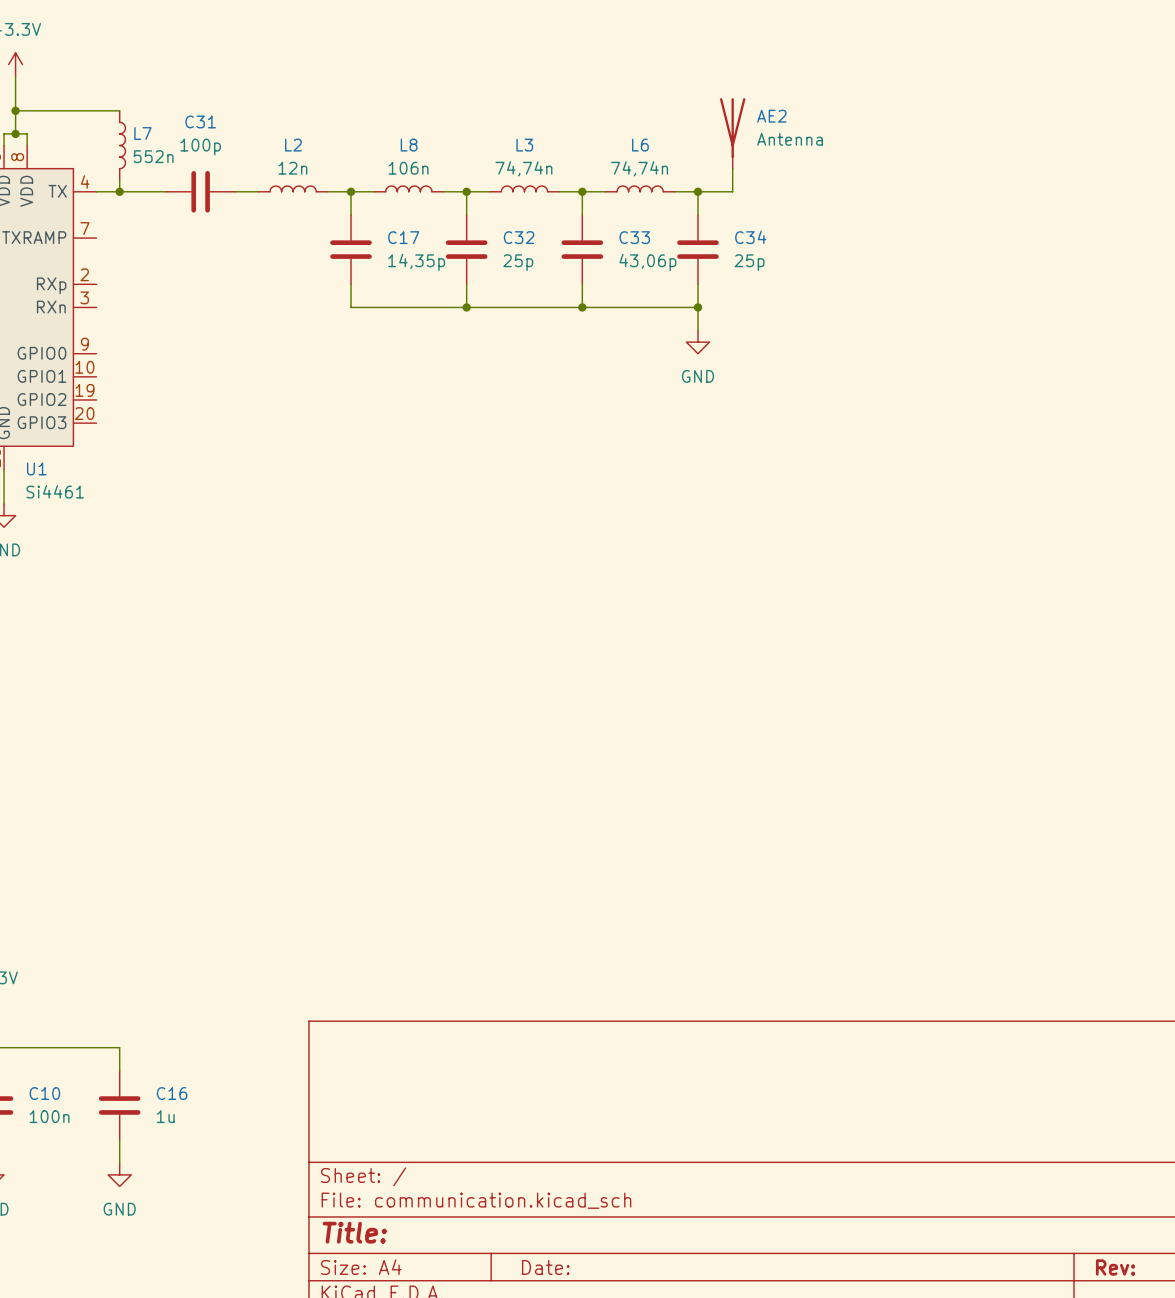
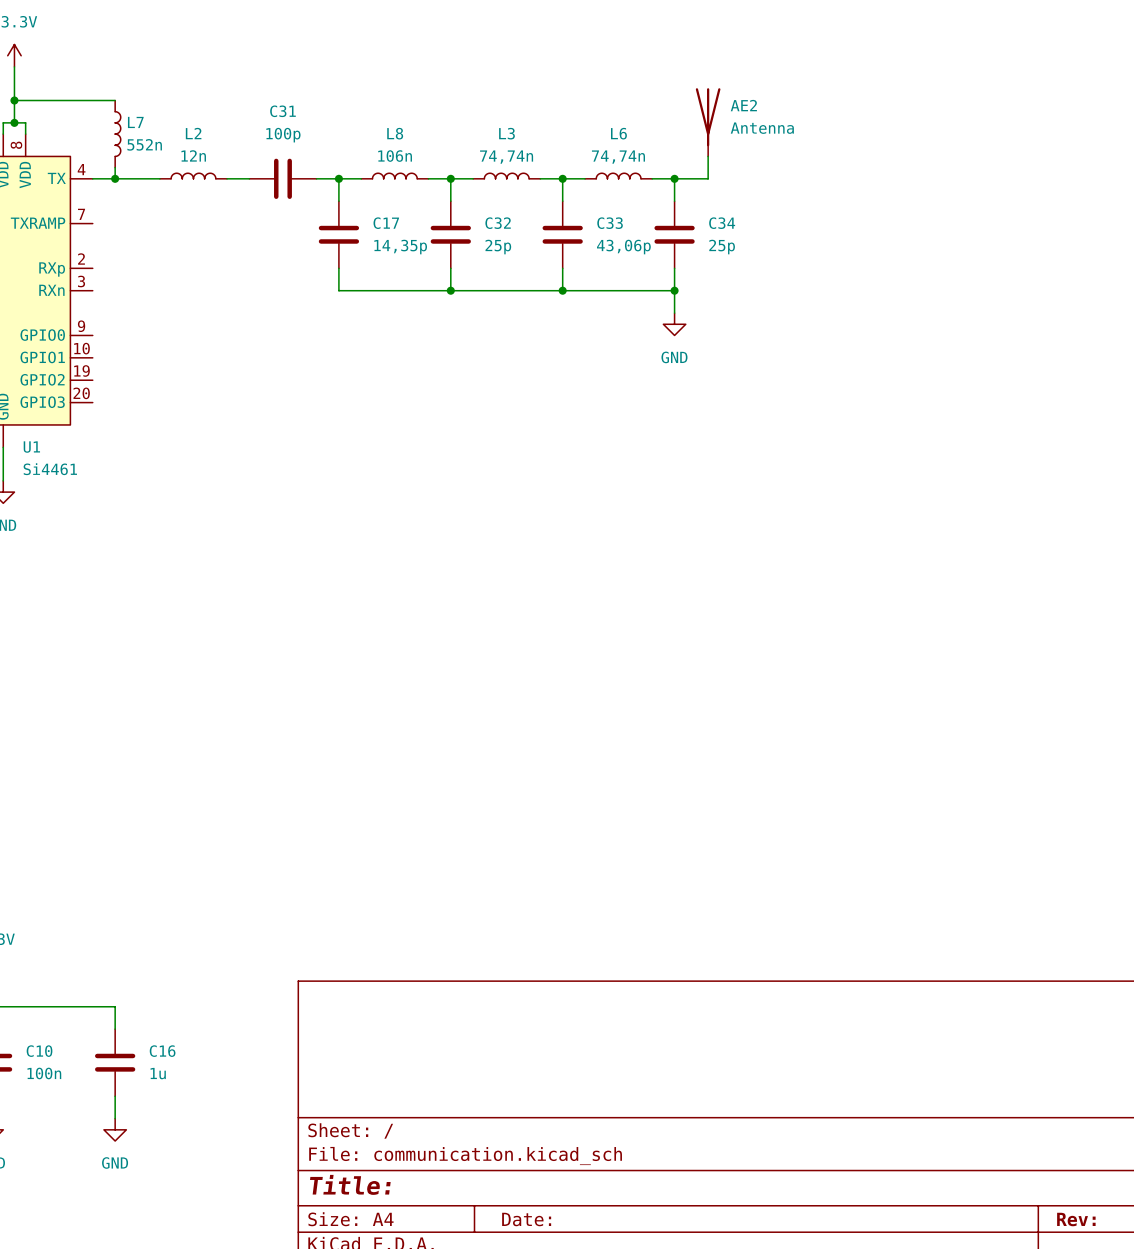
L2 position: (293, 188) -> (193, 176)
C31 position: (200, 191) -> (282, 178)

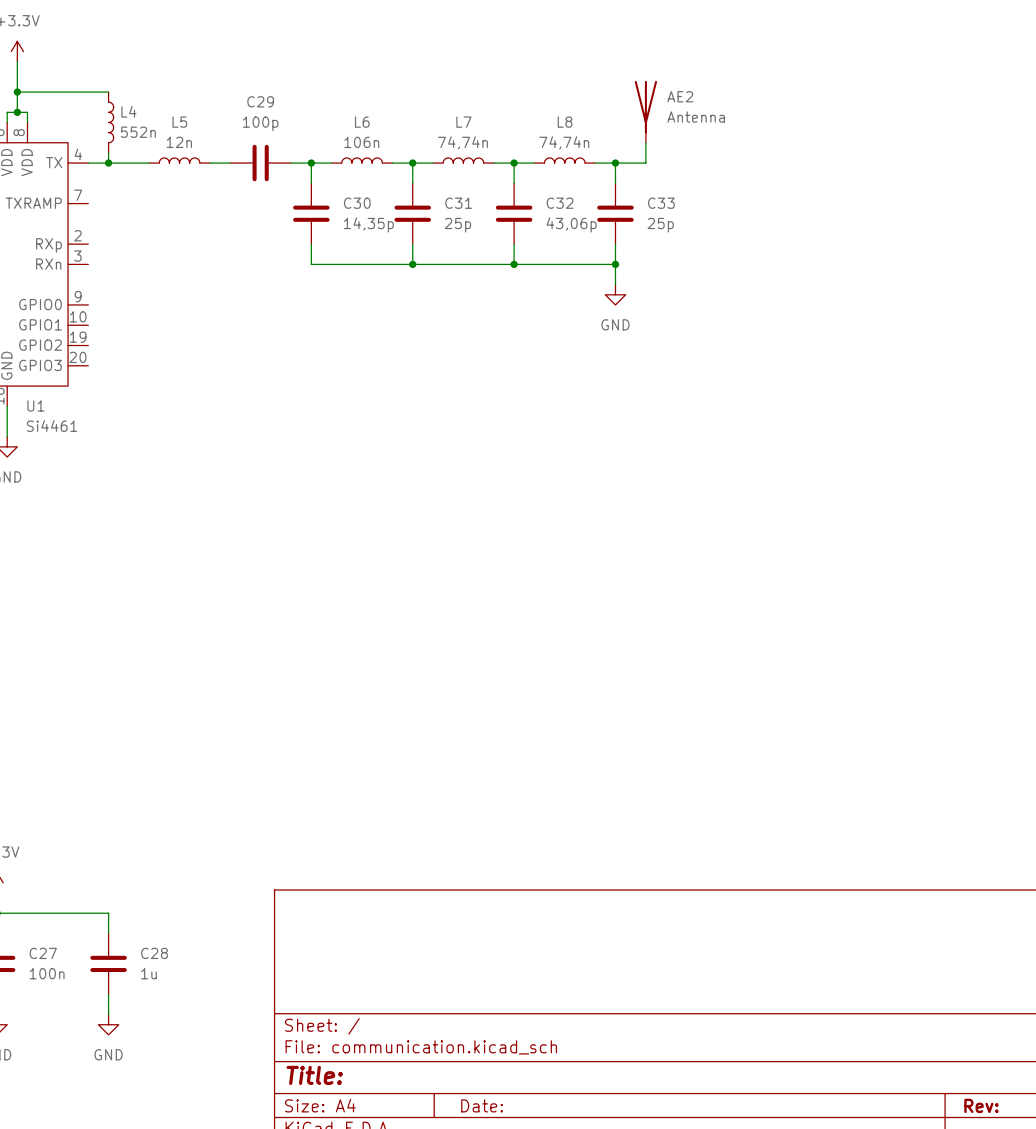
C31 name: C31 (282, 111) -> C29 (260, 101)
L7 name: L7 (135, 122) -> L4 (128, 111)
L2 name: L2 (193, 133) -> L5 (179, 122)
L8 name: L8 (395, 133) -> L6 (362, 122)
L3 name: L3 (506, 133) -> L7 (463, 122)
L6 name: L6 (618, 133) -> L8 (565, 122)
C17 name: C17 (386, 223) -> C30 (357, 203)
C32 name: C32 (498, 223) -> C31 (458, 203)
C33 name: C33 (610, 223) -> C32 (560, 203)
C34 name: C34 (722, 223) -> C33 (661, 203)
C10 name: C10 (39, 1051) -> C27 (43, 953)
C16 name: C16 (162, 1051) -> C28 (154, 953)

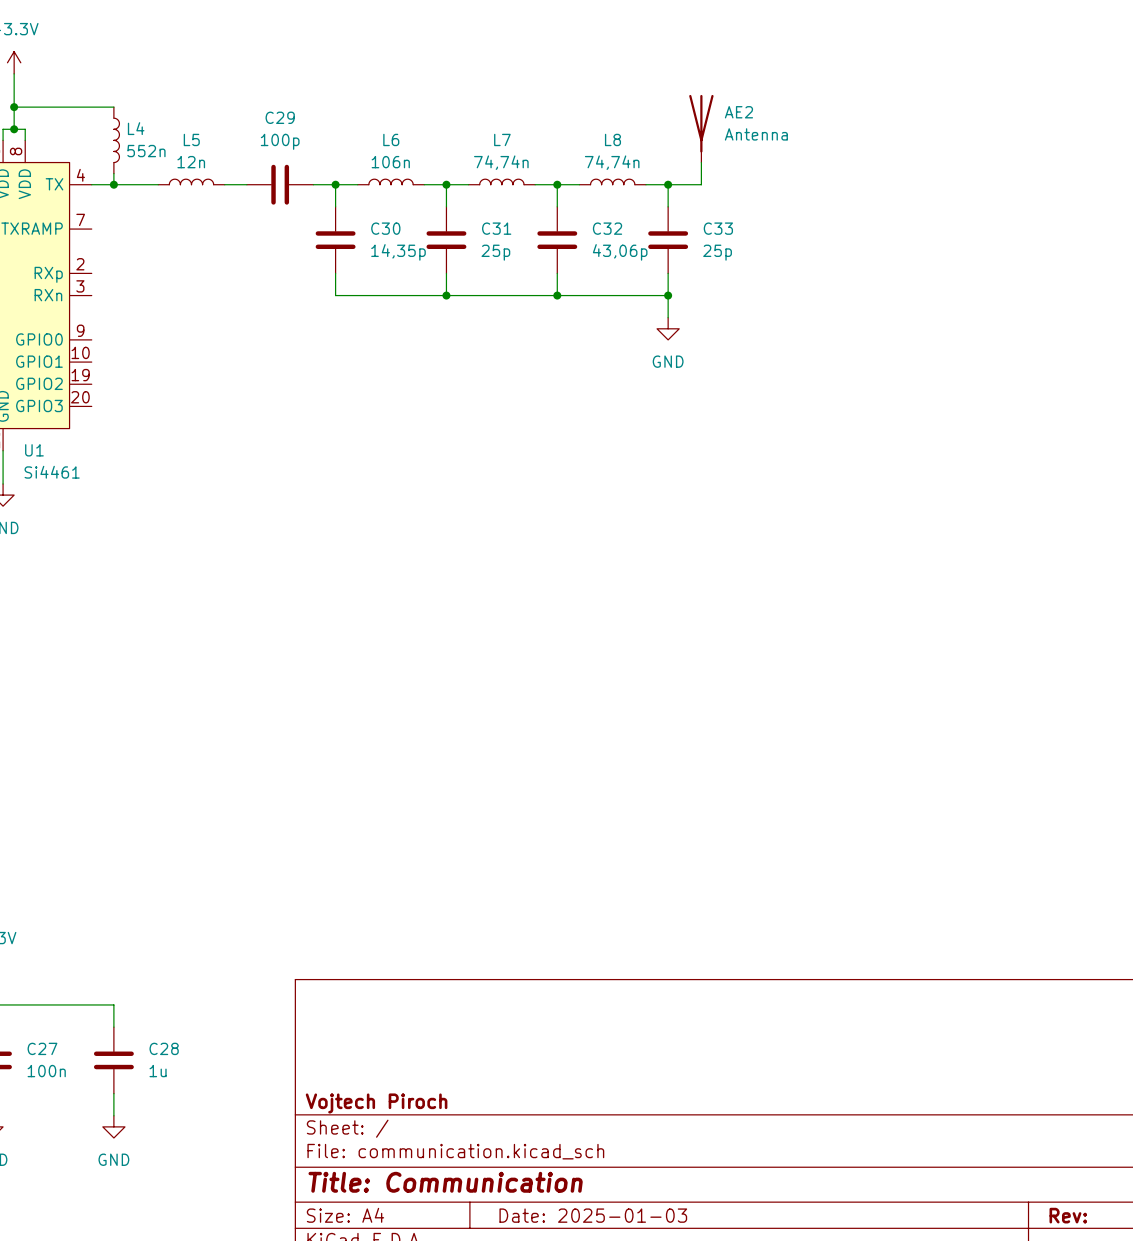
title block: none -> Vojtech Piroch (376, 1103)
title block: Title: (314, 1075) -> Title: Communication (445, 1182)
title block: Date: (482, 1105) -> Date: 2025-01-03 (593, 1215)

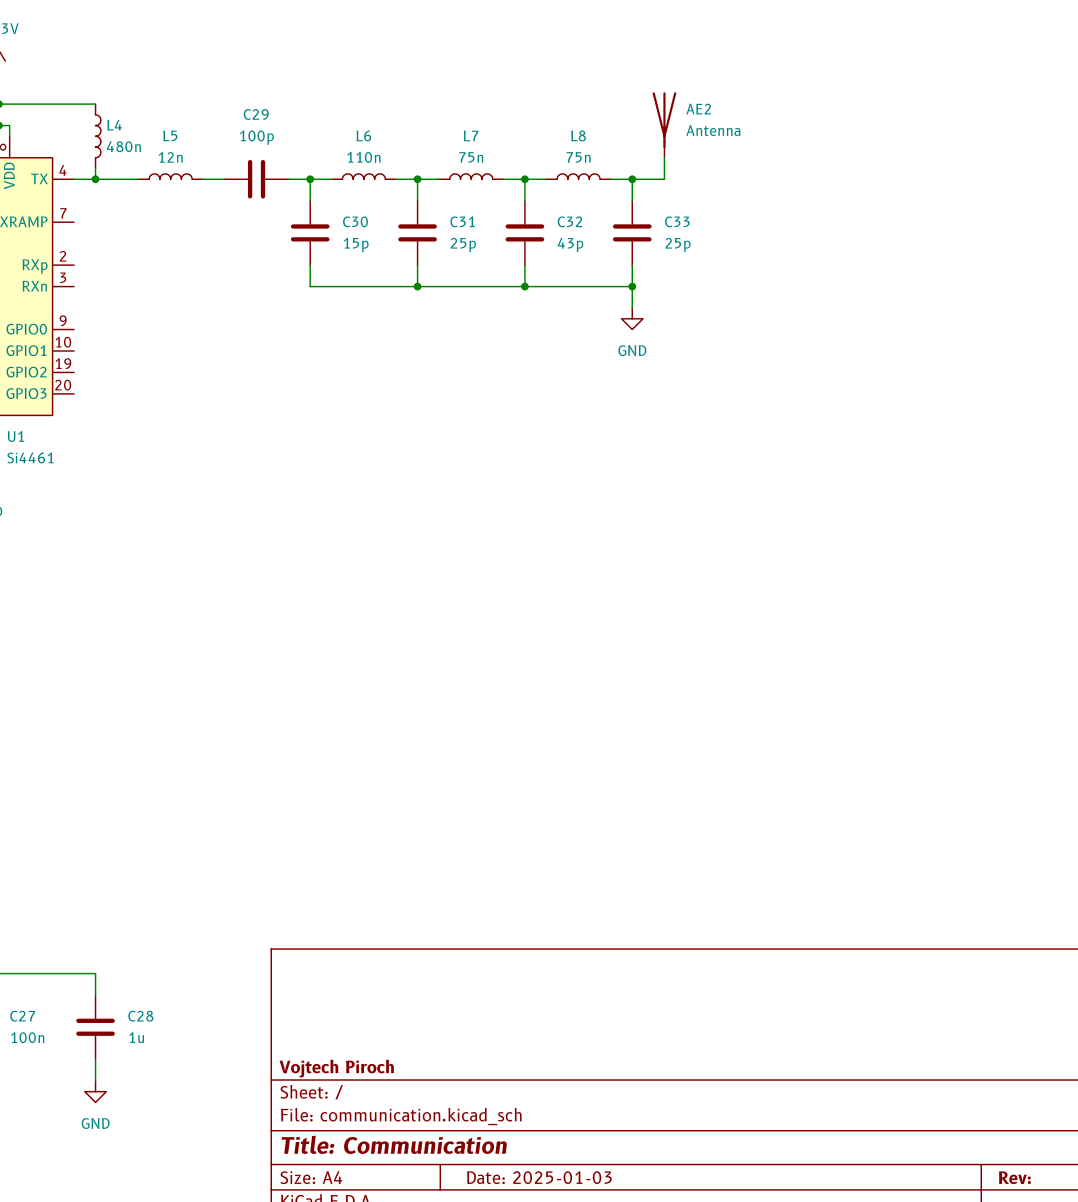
L4 value: 552n (146, 151) -> 480n (123, 146)
L6 value: 106n (390, 162) -> 110n (363, 157)
L7 value: 74,74n (501, 162) -> 75n (471, 157)
L8 value: 74,74n (612, 162) -> 75n (578, 157)
C30 value: 14,35p (398, 252) -> 15p (356, 245)
C32 value: 43,06p (620, 252) -> 43p (570, 245)

